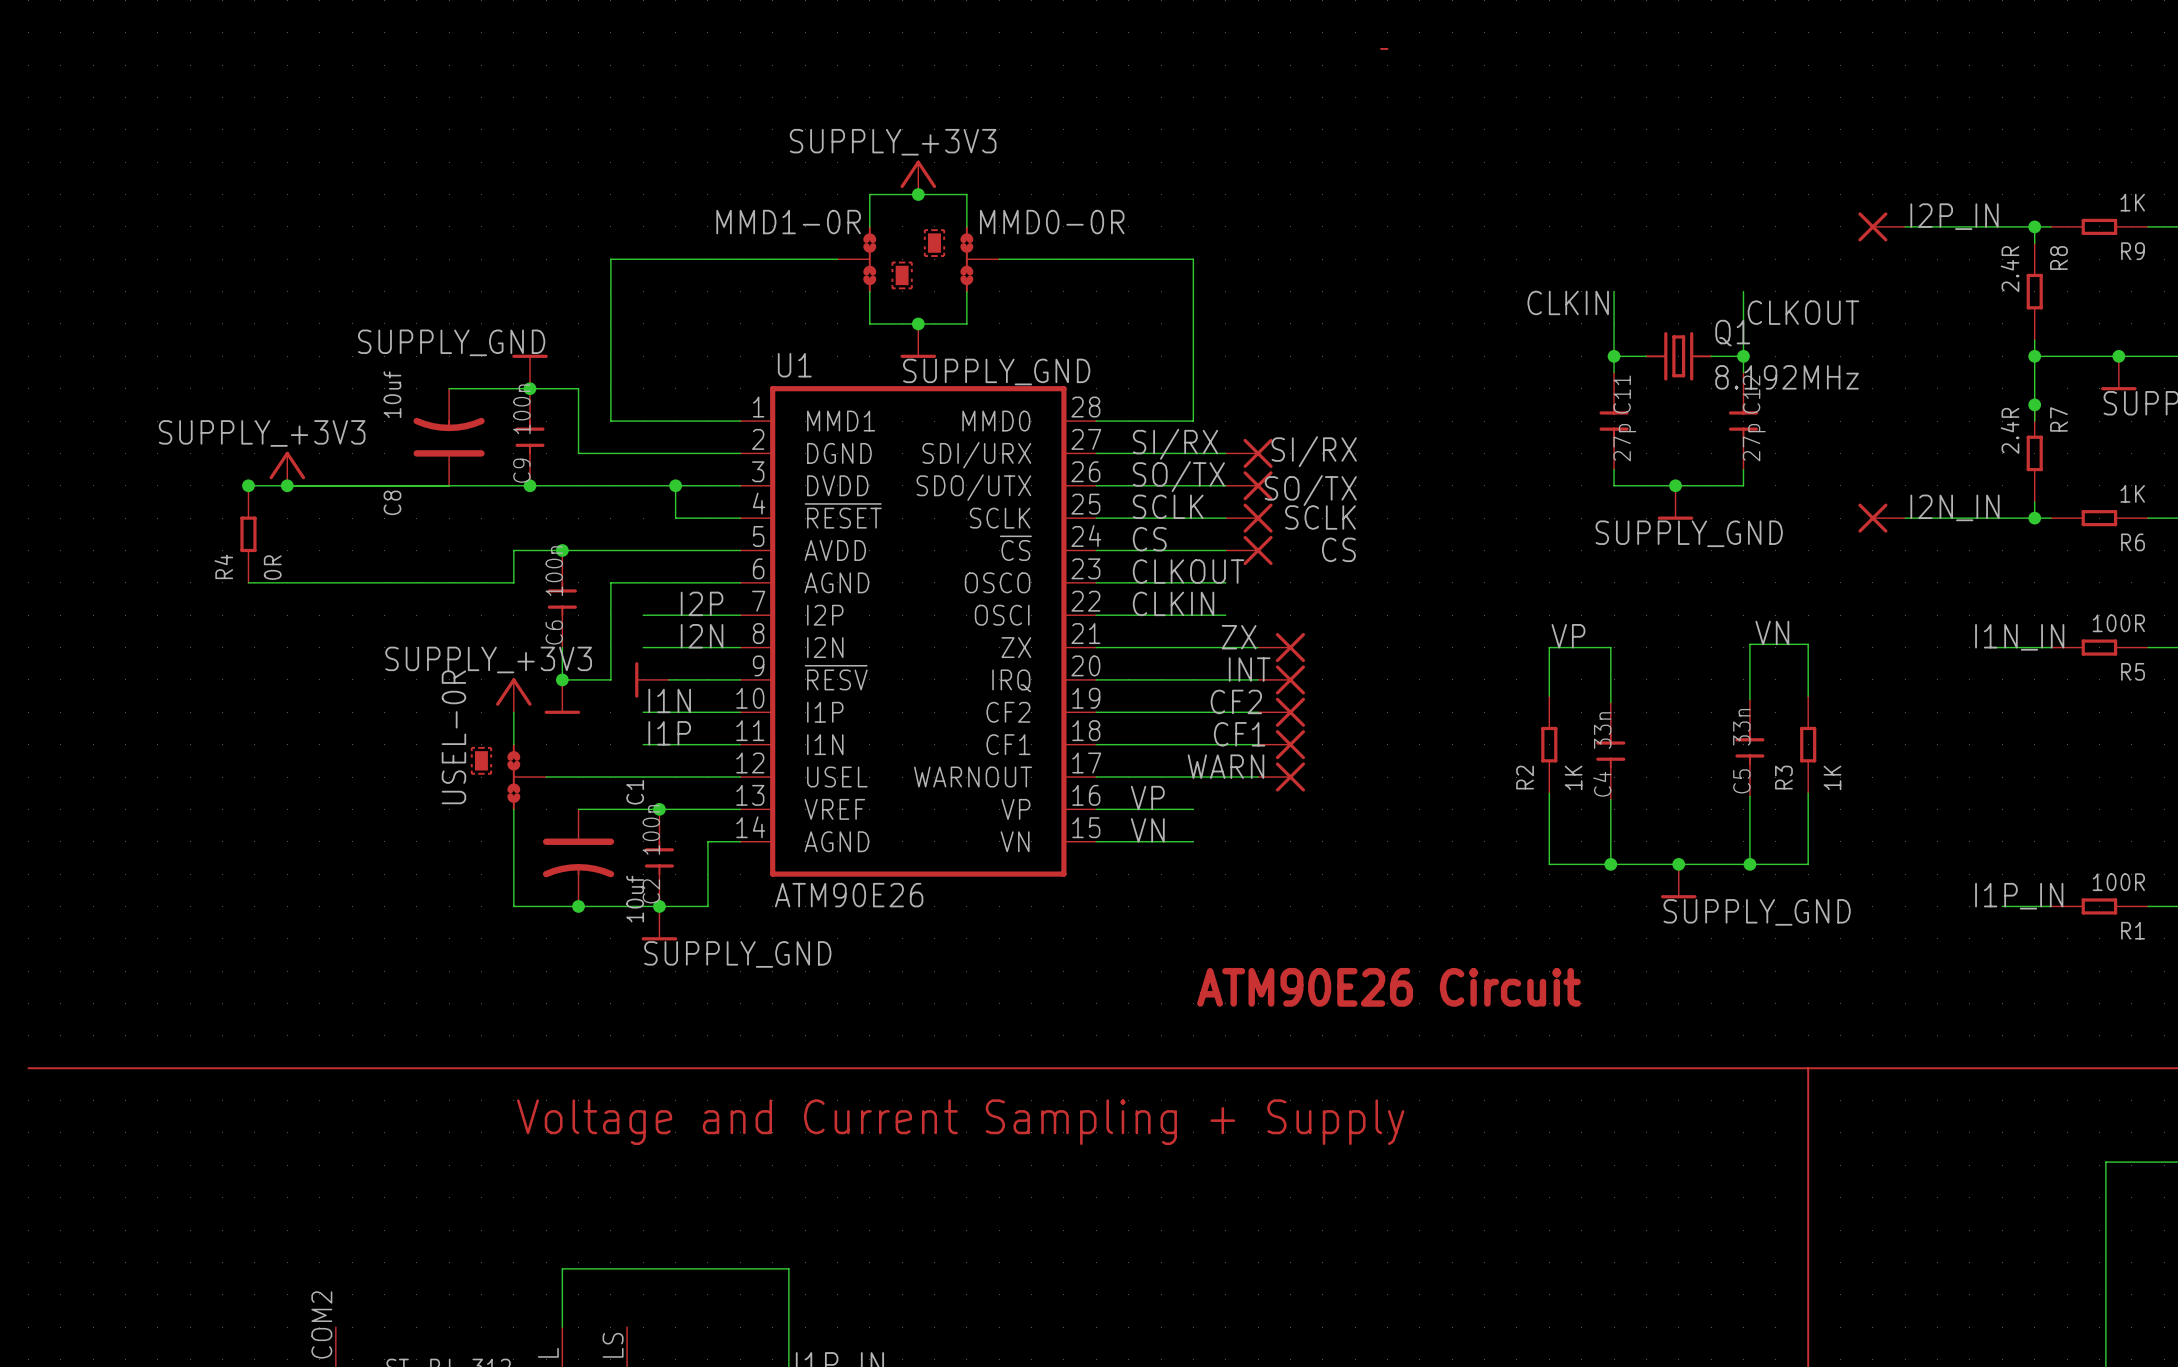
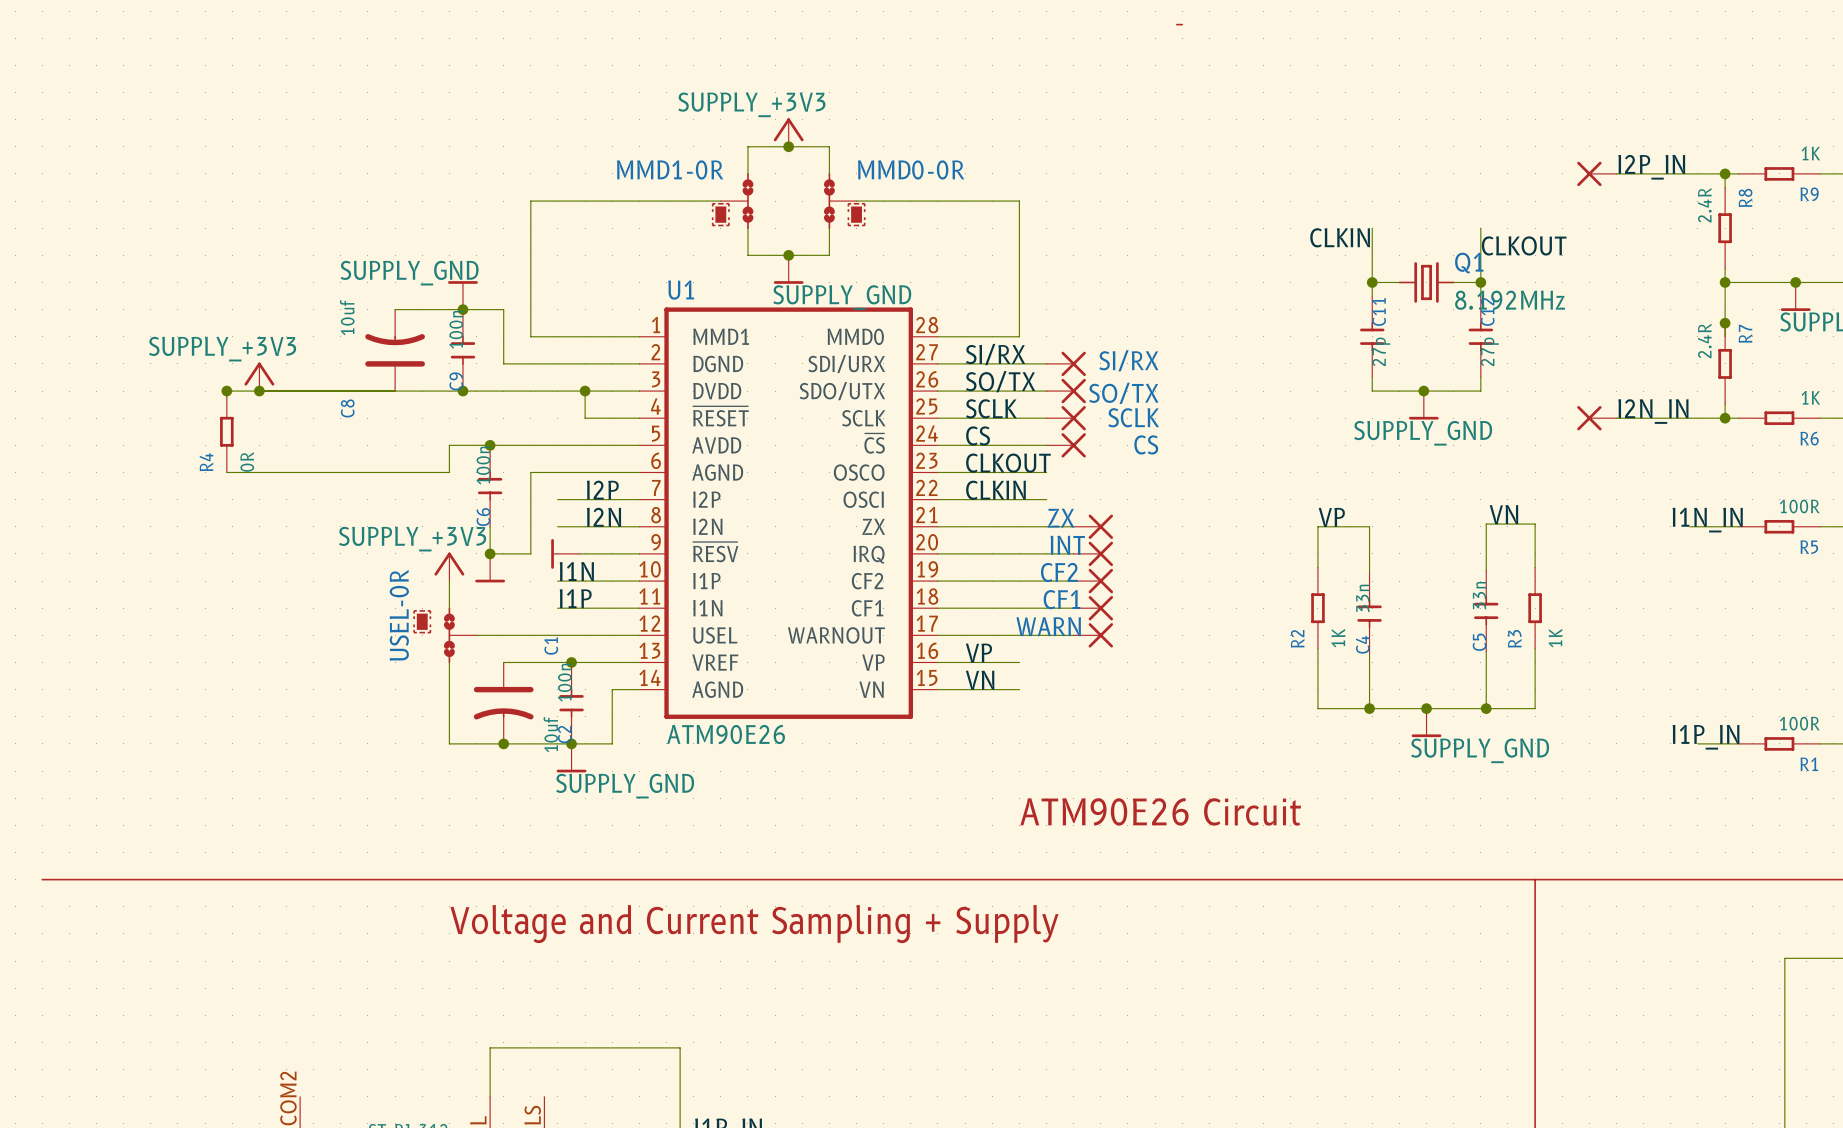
part: (934, 243) -> none
part: none -> (720, 214)
part: (902, 275) -> none
part: none -> (856, 214)

